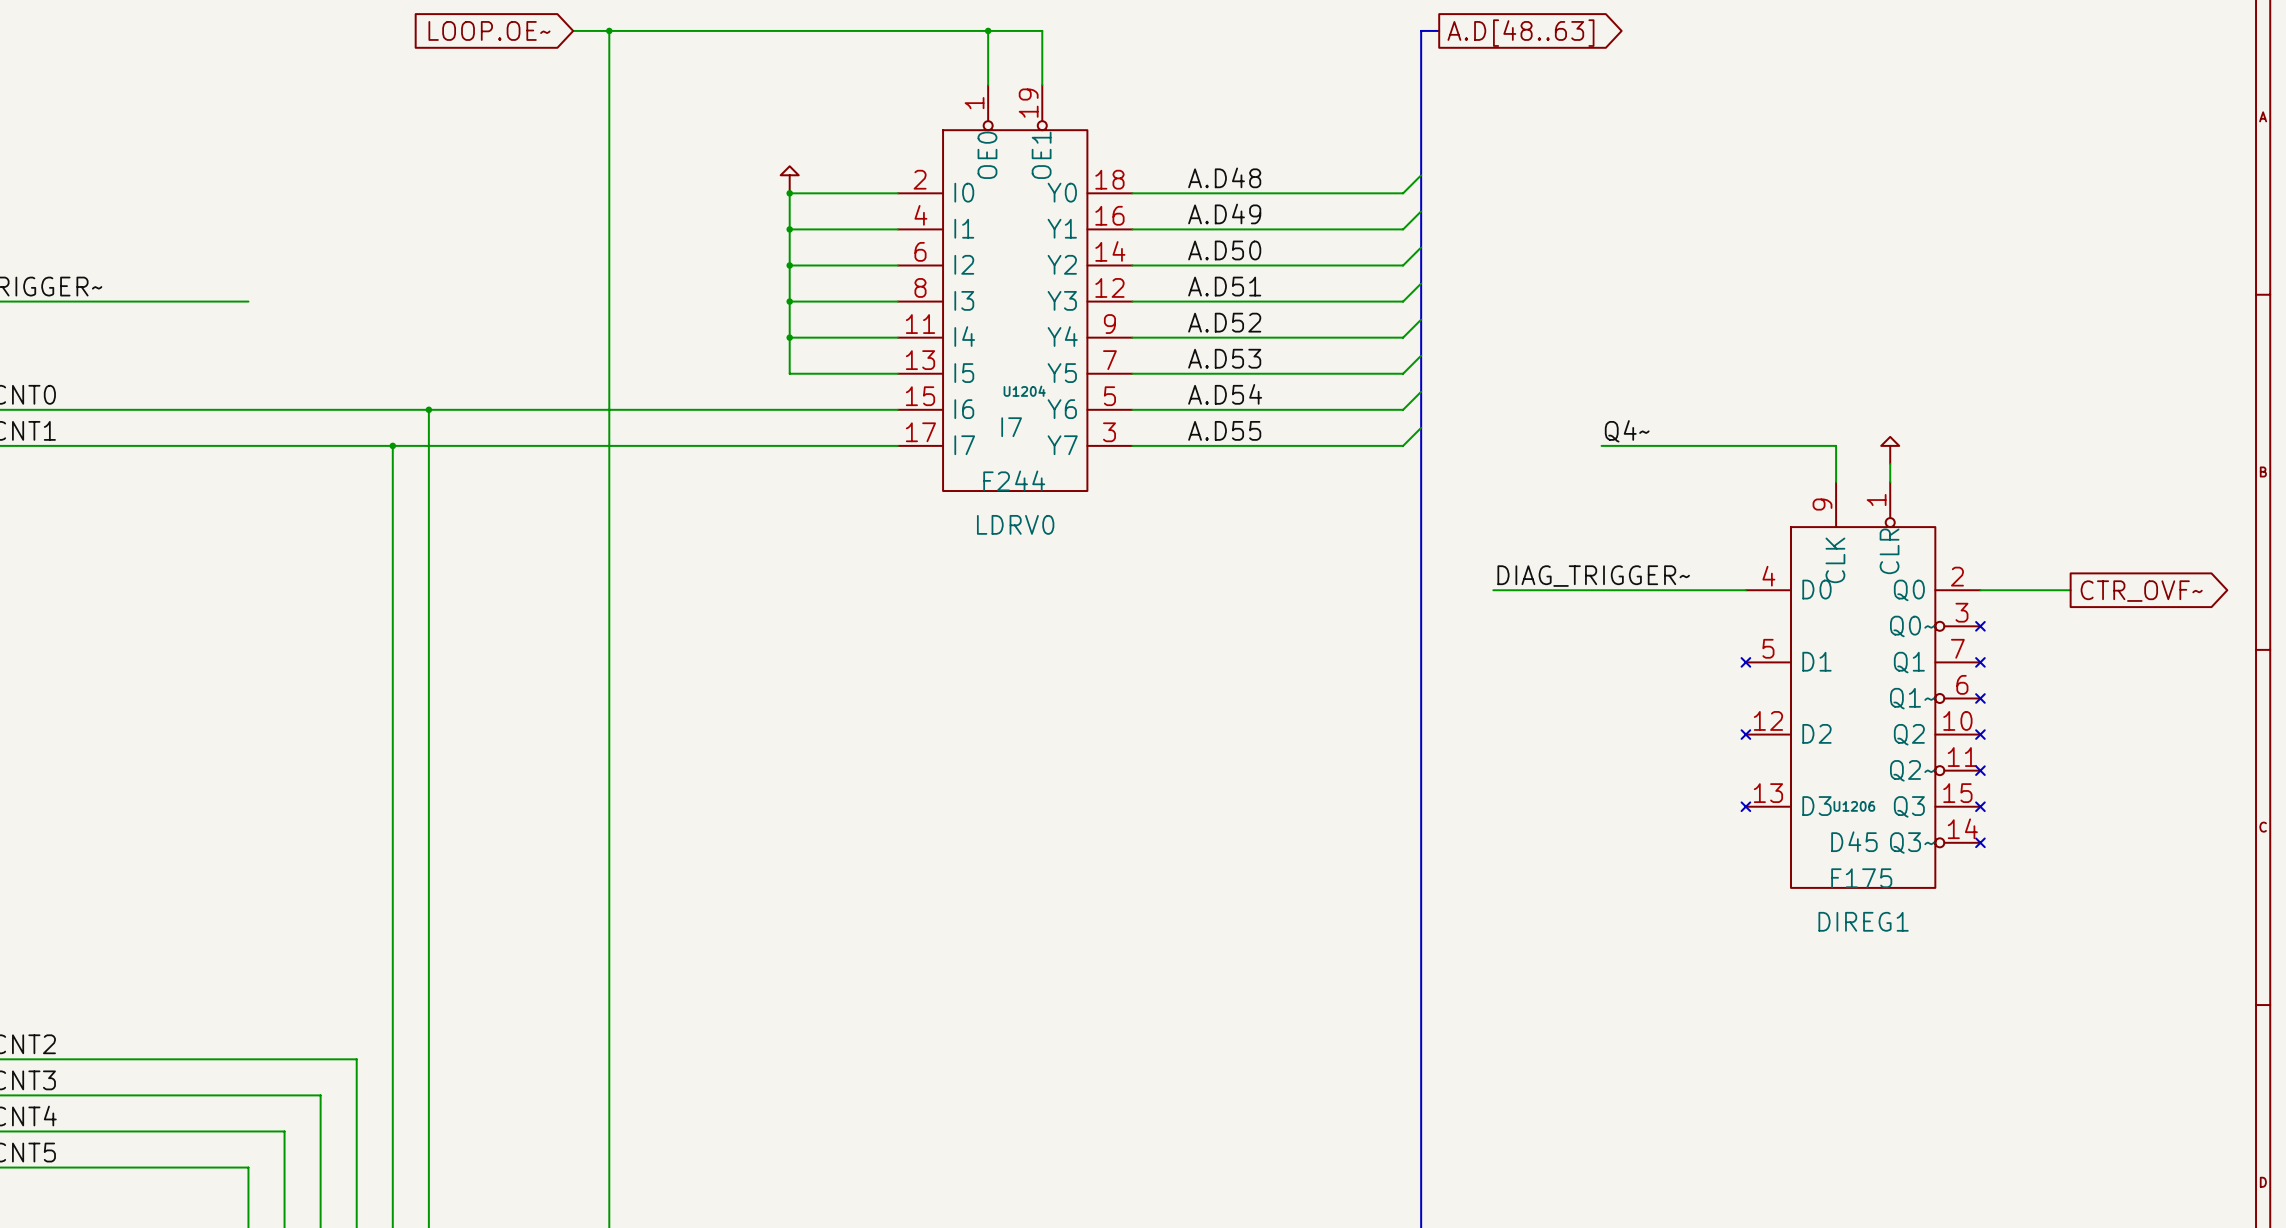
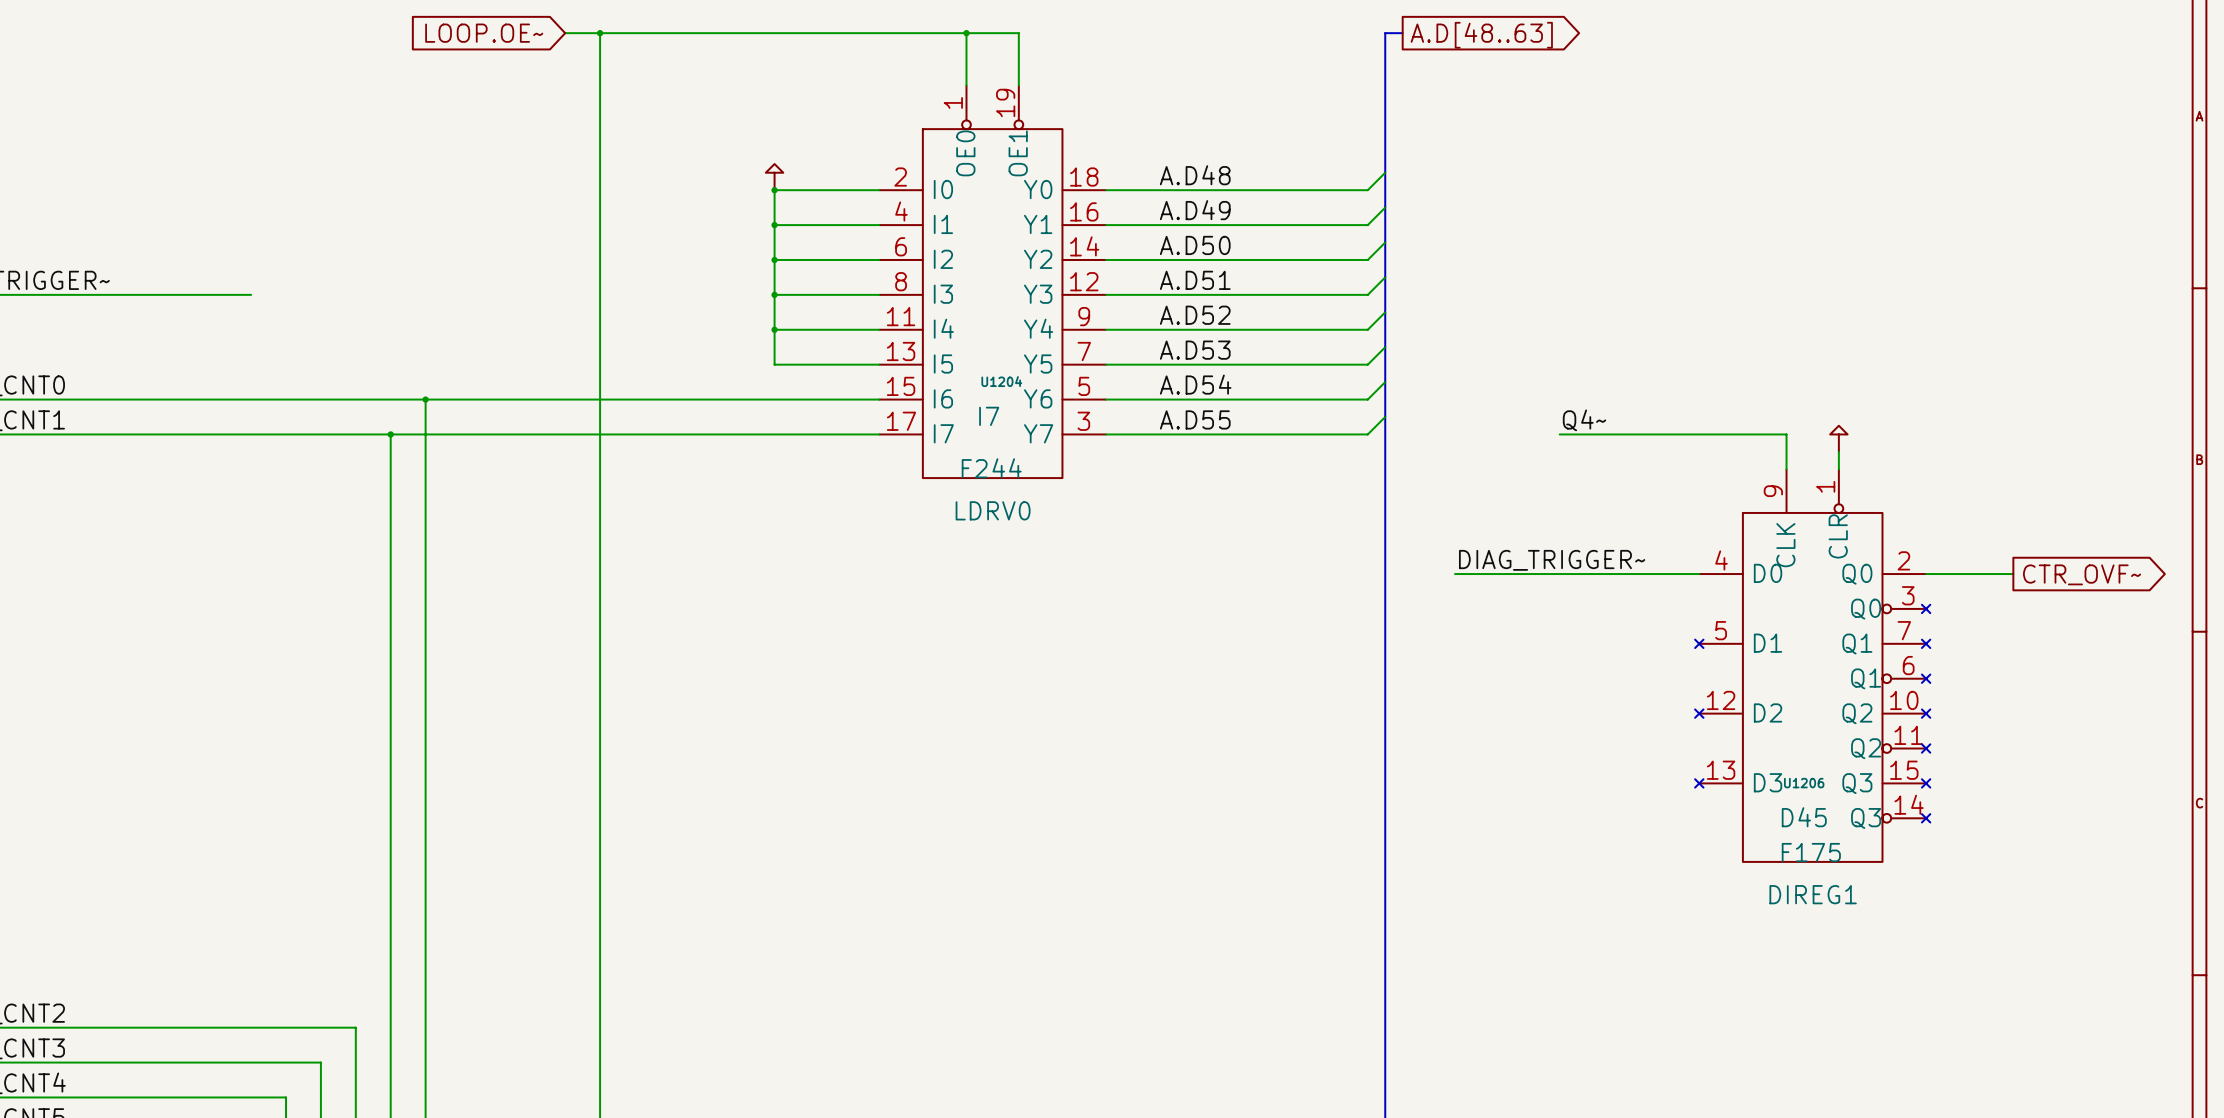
U1206 pin name: Q0~ (1912, 626) -> Q0 (1866, 609)
U1206 pin name: Q1~ (1912, 698) -> Q1 (1866, 678)
U1206 pin name: Q2~ (1912, 770) -> Q2 (1866, 748)
U1206 pin name: Q3~ (1912, 842) -> Q3 (1866, 818)

